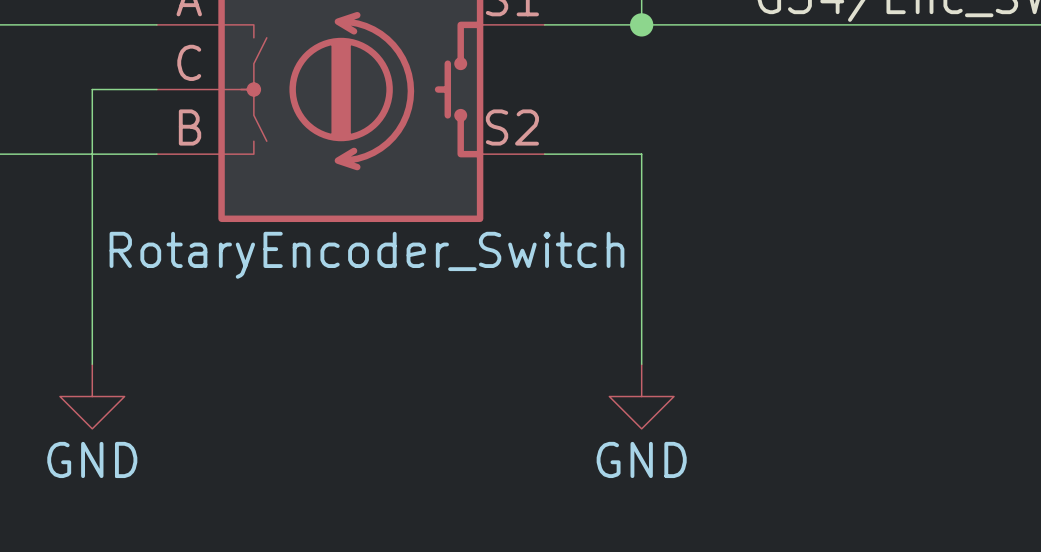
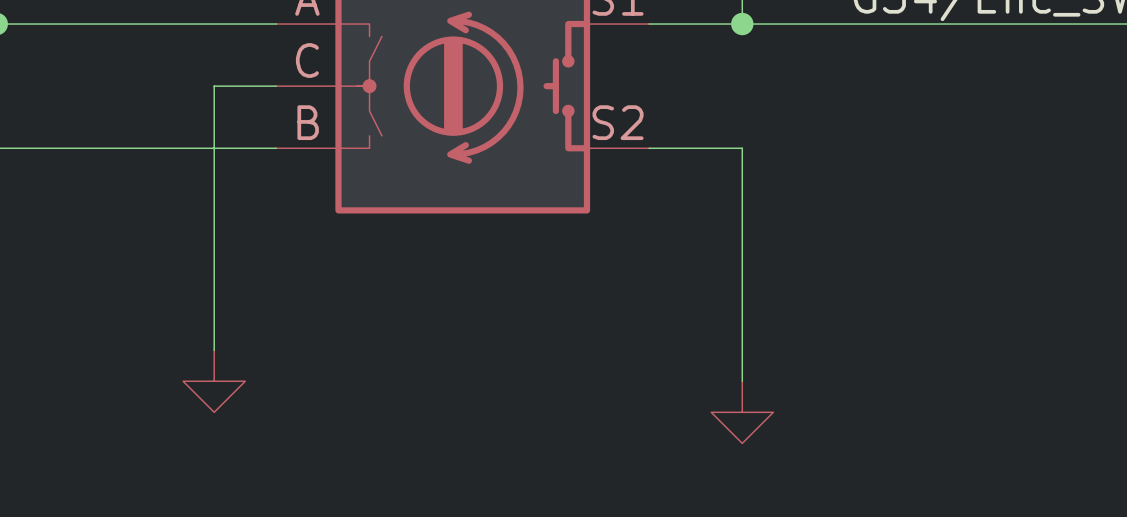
part value: RotaryEncoder_Switch (366, 255) -> none
power symbol: GND (641, 396) -> none
power symbol: none -> (742, 412)
power symbol text: GND (92, 459) -> none

